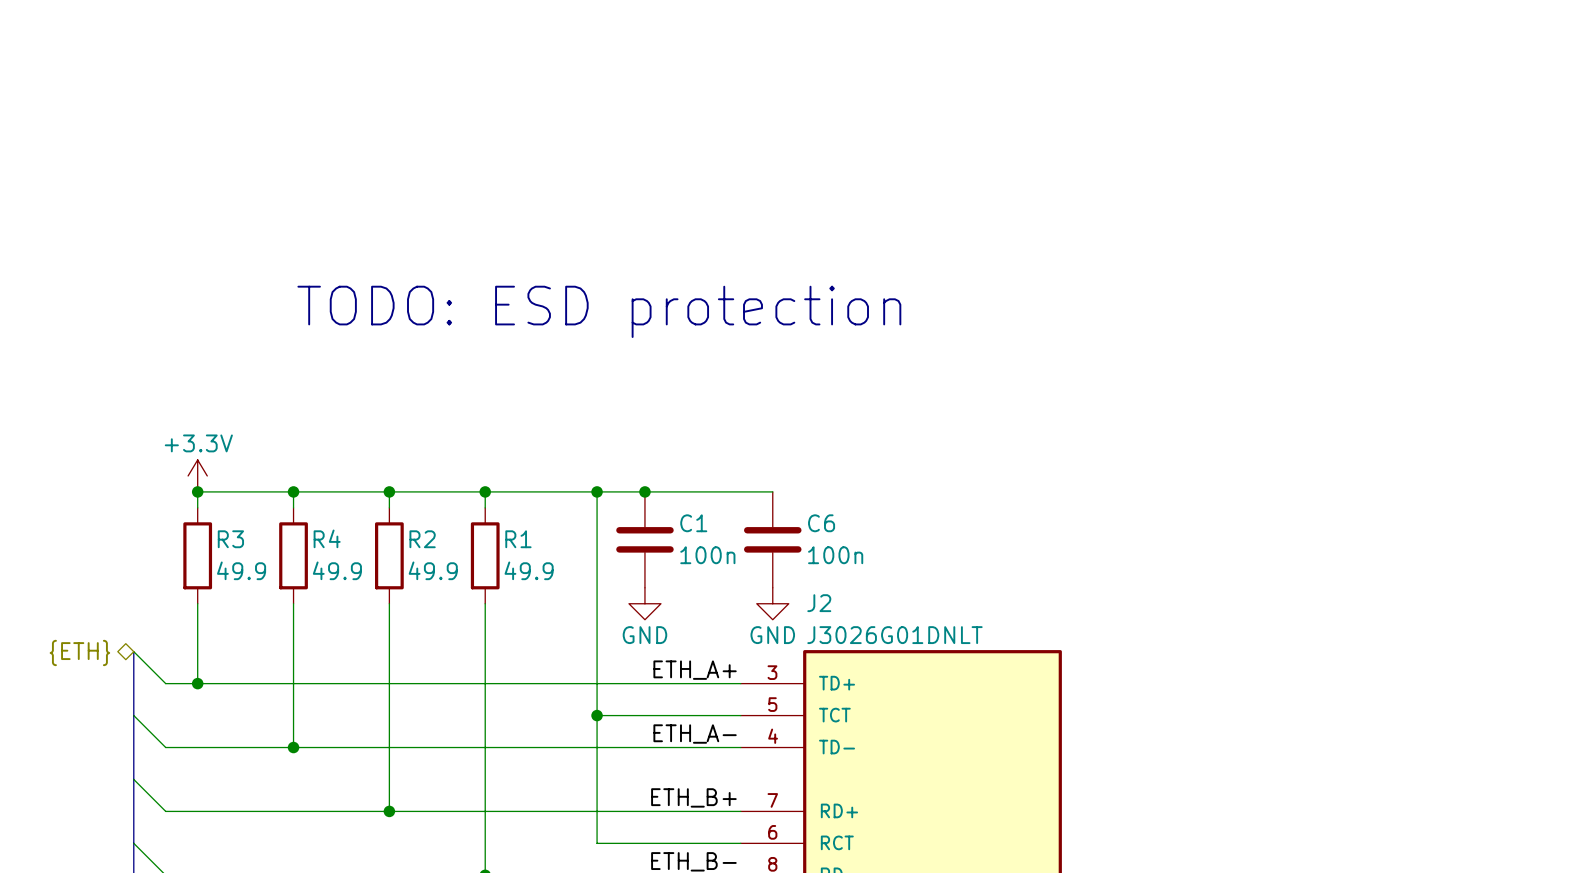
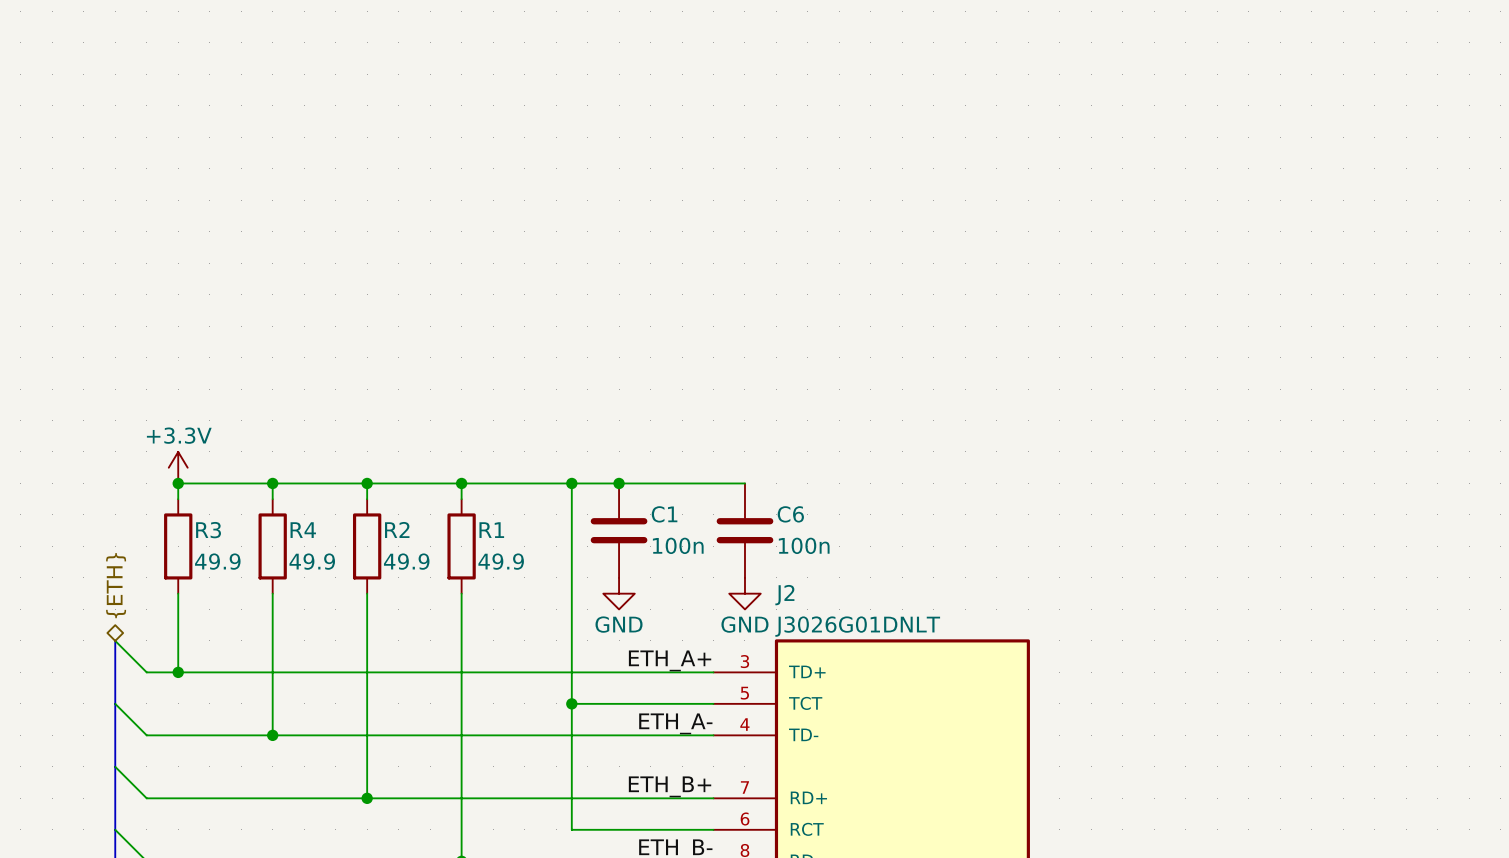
text: TODO: ESD protection (599, 311) -> none
hierarchical label rotation: 0° (79, 652) -> 90° clockwise (116, 585)
hierarchical label position: {ETH} (79, 652) -> {ETH} (116, 585)

